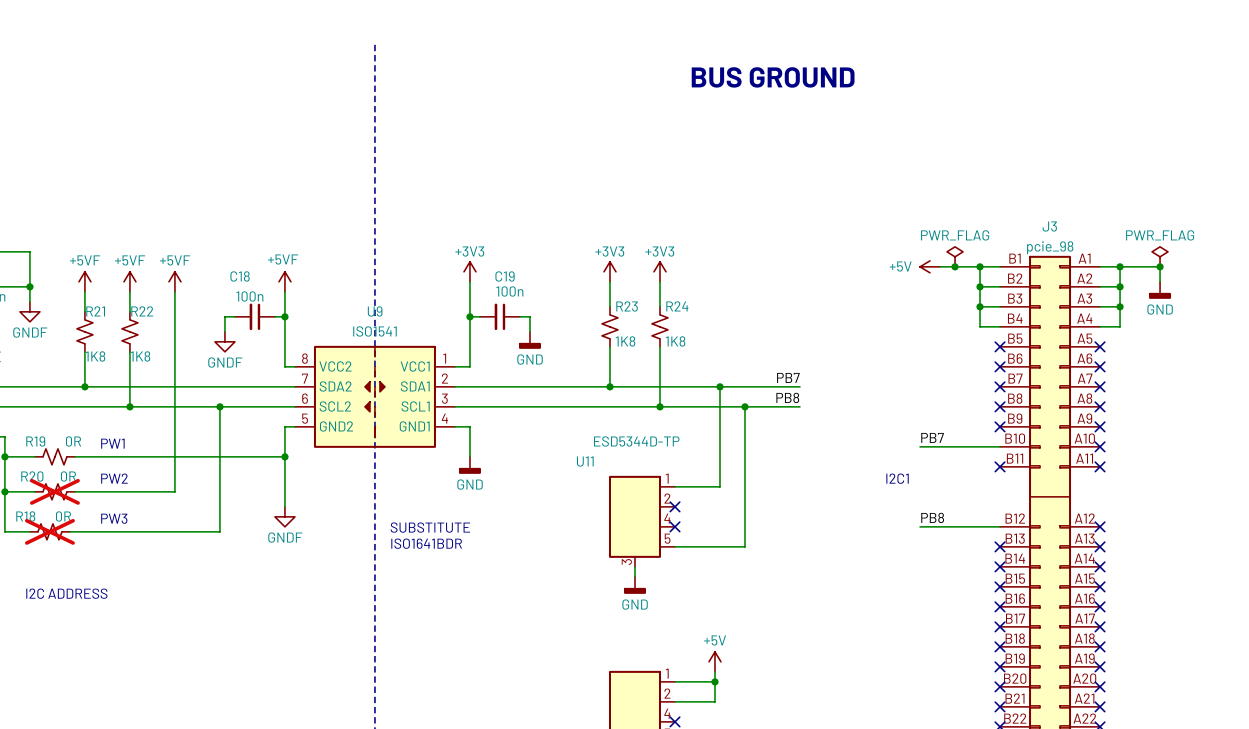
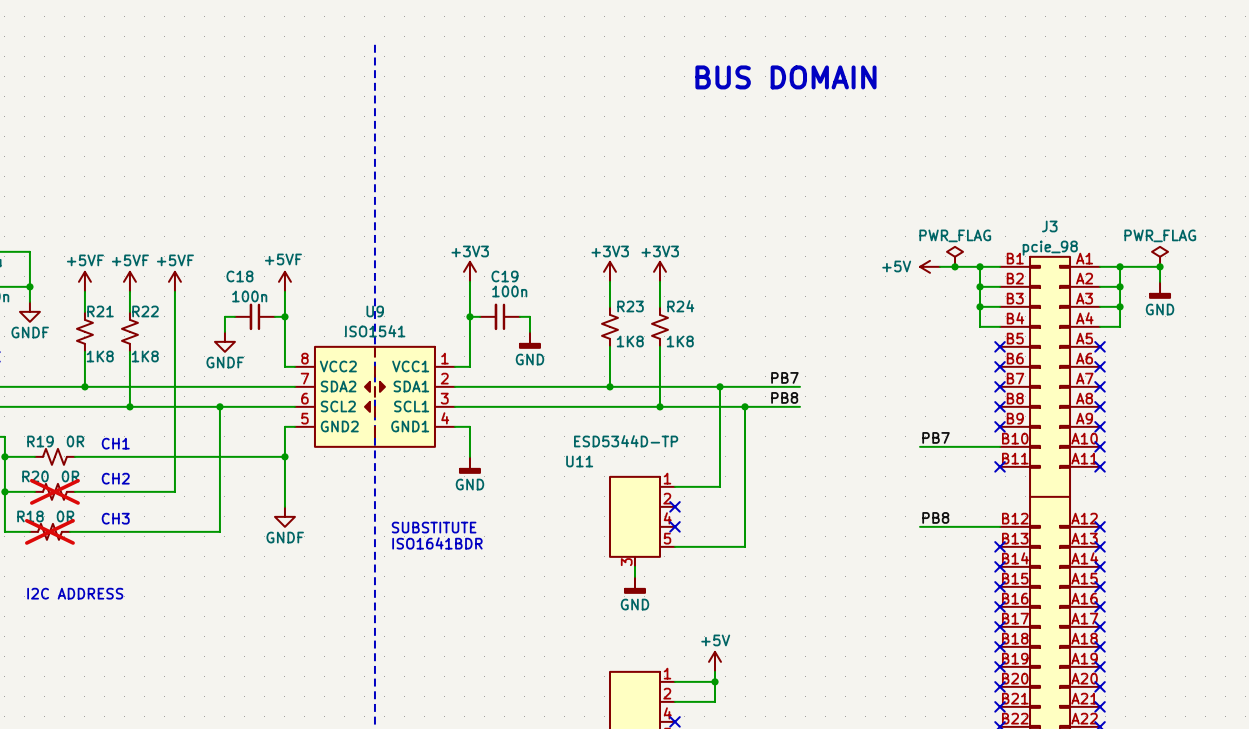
text: BUS GROUND (773, 77) -> BUS DOMAIN (785, 77)
text: PW1 (112, 443) -> CH1 (115, 443)
text: PW2 (114, 478) -> CH2 (115, 478)
text: I2C1 (897, 478) -> none
text: PW3 (114, 518) -> CH3 (115, 518)

